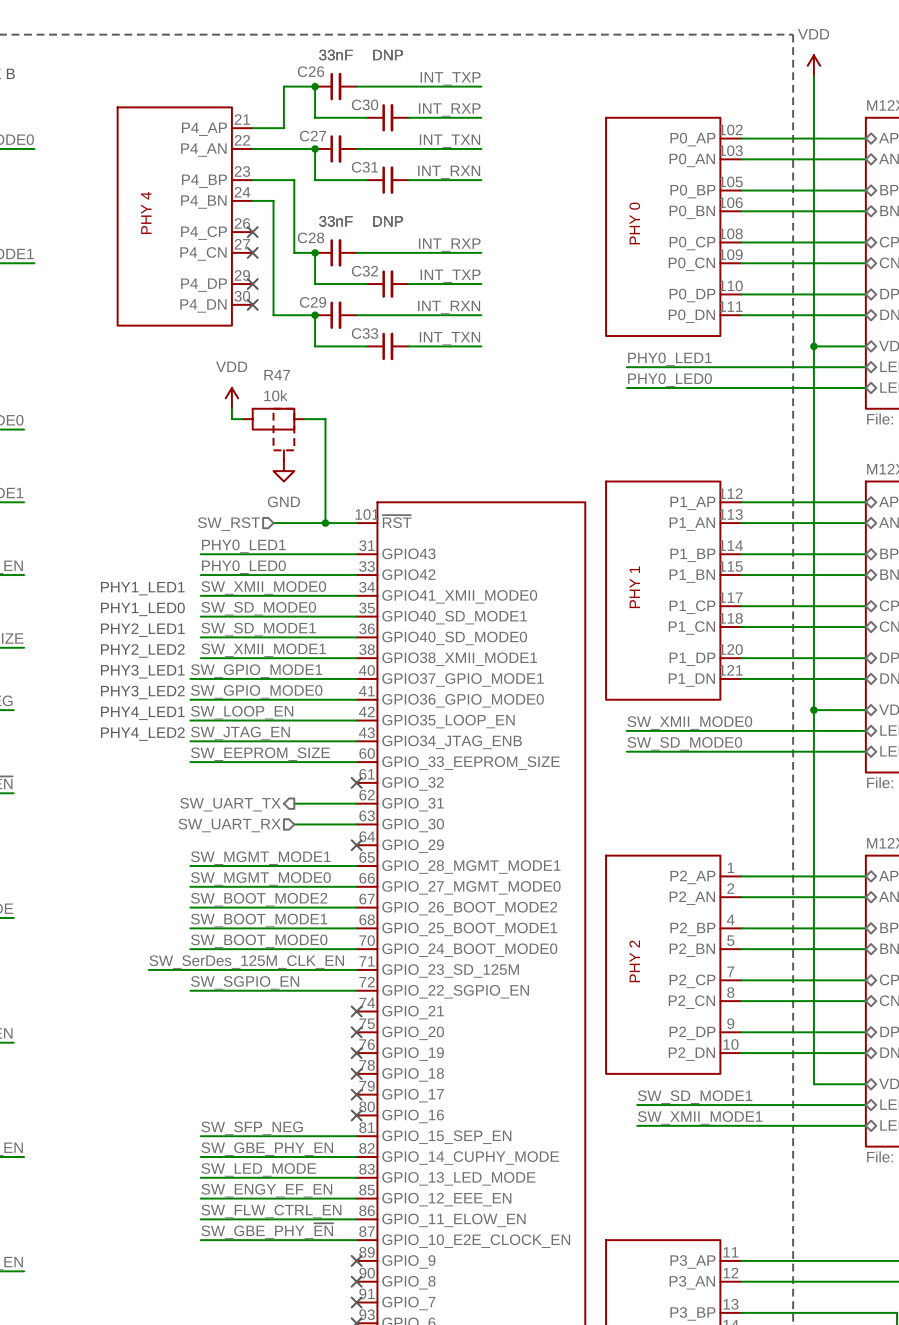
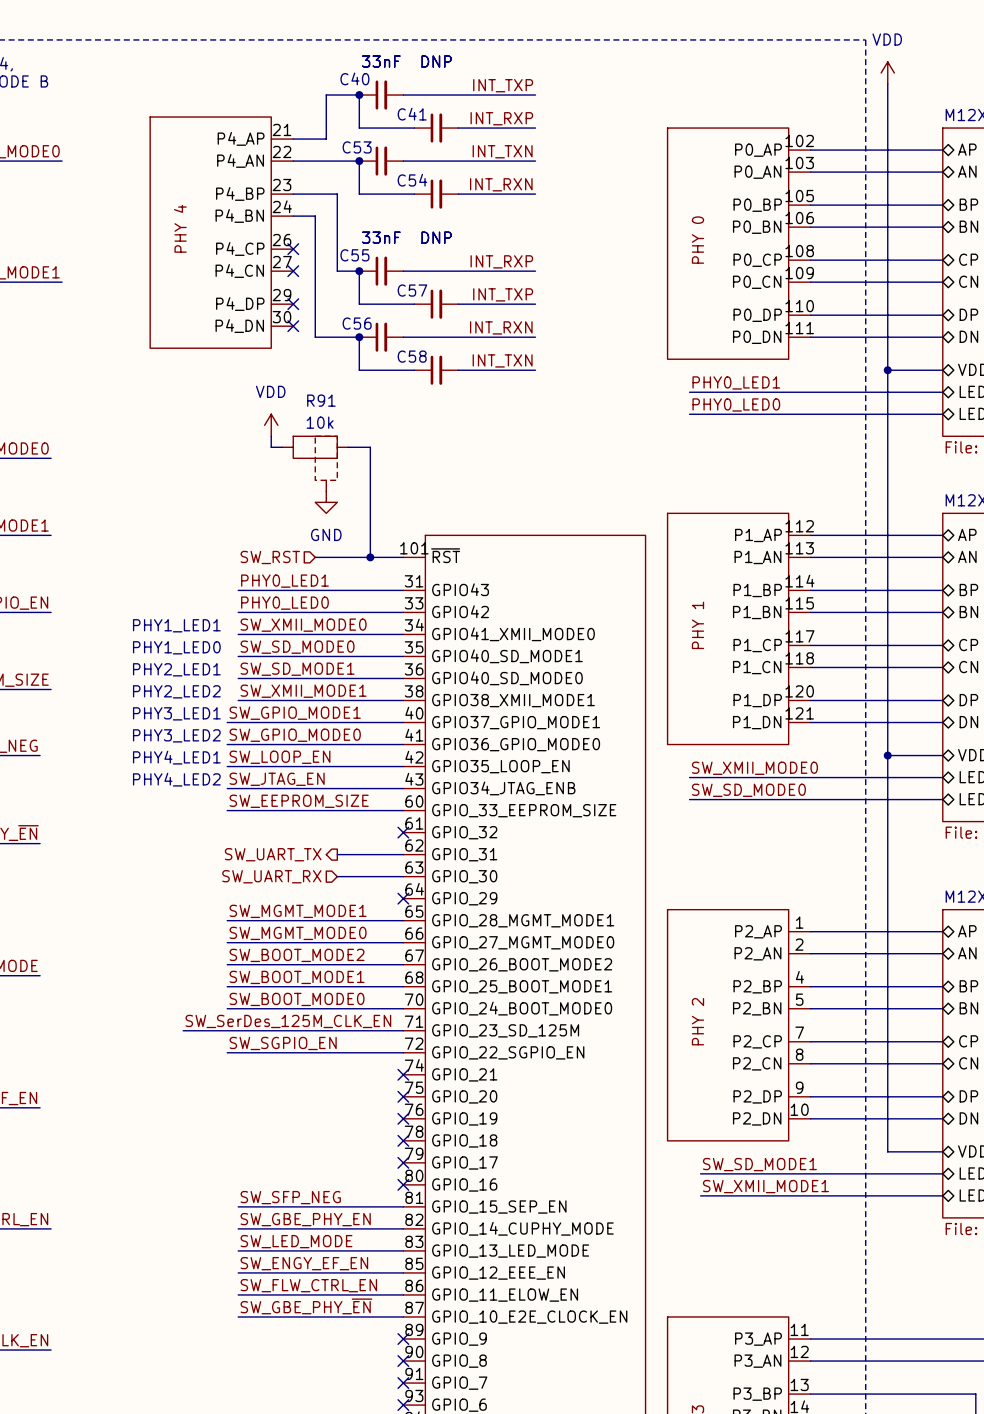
C26 name: C26 (310, 71) -> C40 (354, 78)
C30 name: C30 (365, 104) -> C41 (412, 114)
C27 name: C27 (313, 136) -> C53 (357, 147)
C31 name: C31 (364, 167) -> C54 (412, 180)
C28 name: C28 (310, 237) -> C55 (354, 255)
C32 name: C32 (364, 271) -> C57 (412, 290)
C29 name: C29 (313, 302) -> C56 (357, 323)
C33 name: C33 (365, 333) -> C58 (412, 356)
R47 name: R47 (277, 375) -> R91 (321, 400)

